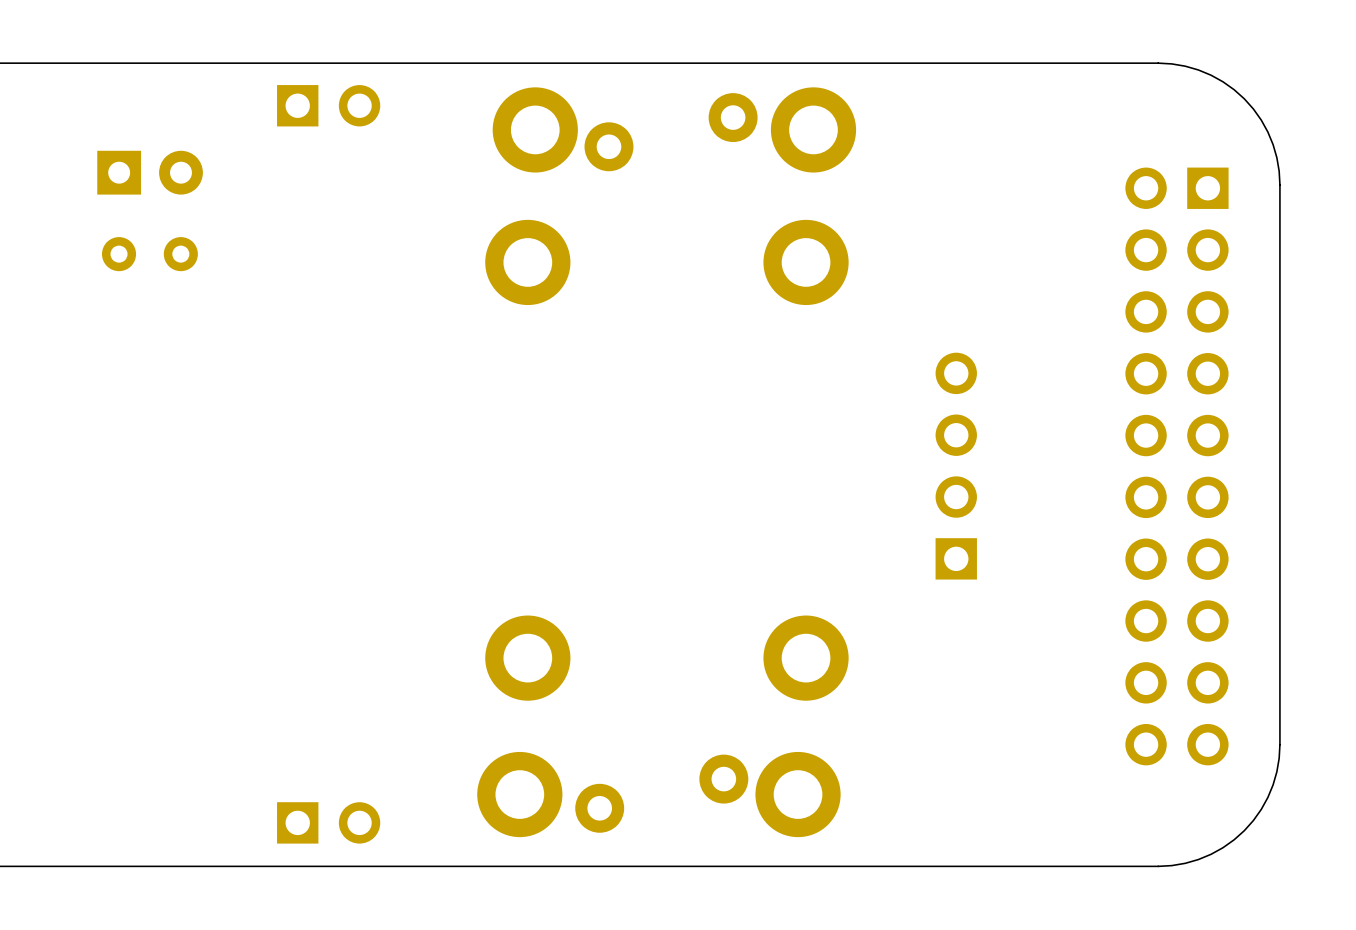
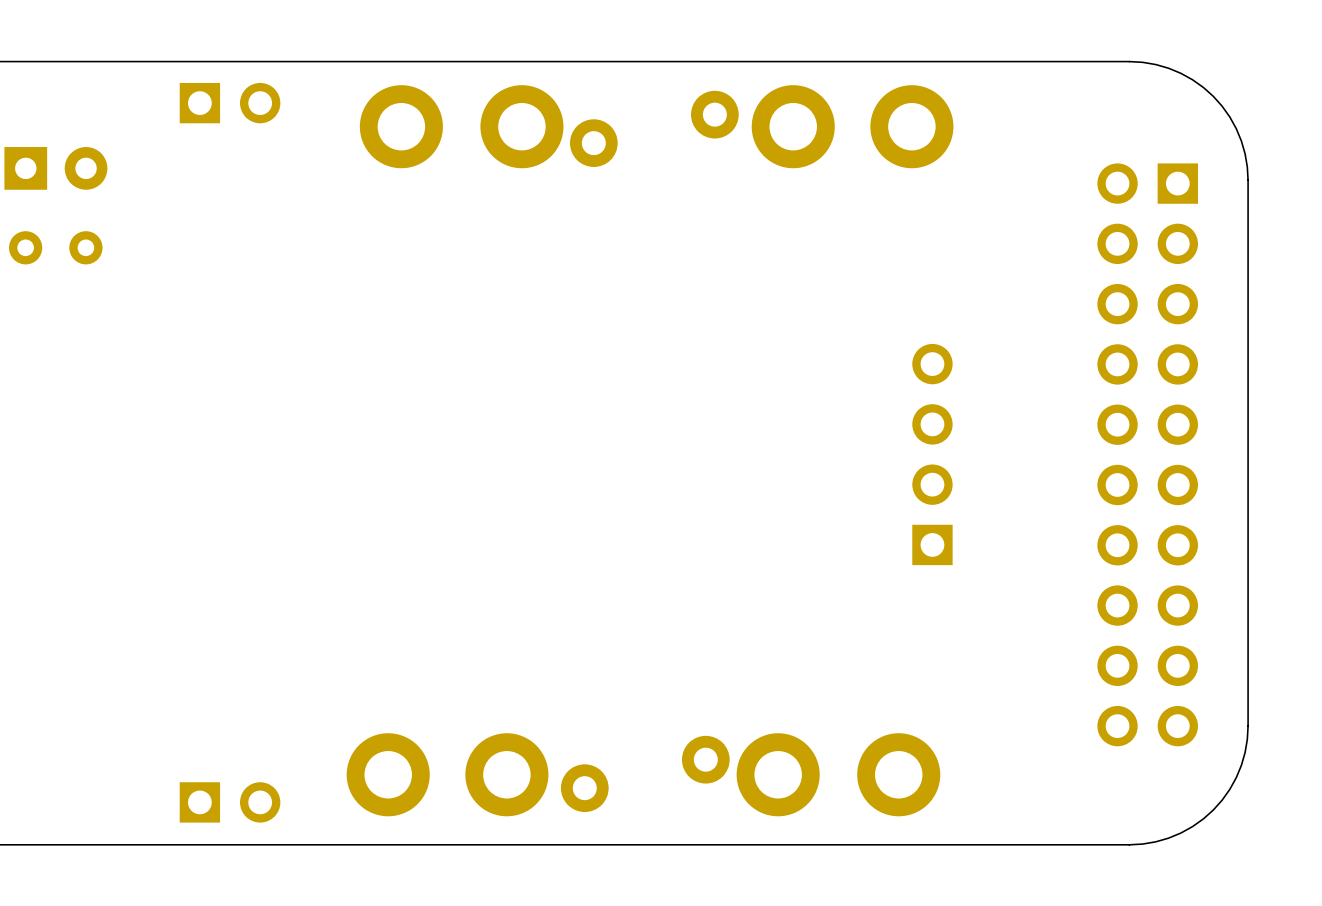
part position: (328, 105) -> (230, 103)
part position: (150, 172) -> (55, 168)
part position: (149, 254) -> (55, 247)
part position: (527, 262) -> (401, 126)
part position: (806, 262) -> (911, 126)
part position: (527, 658) -> (388, 774)
part position: (806, 658) -> (898, 774)
part position: (328, 822) -> (230, 802)

